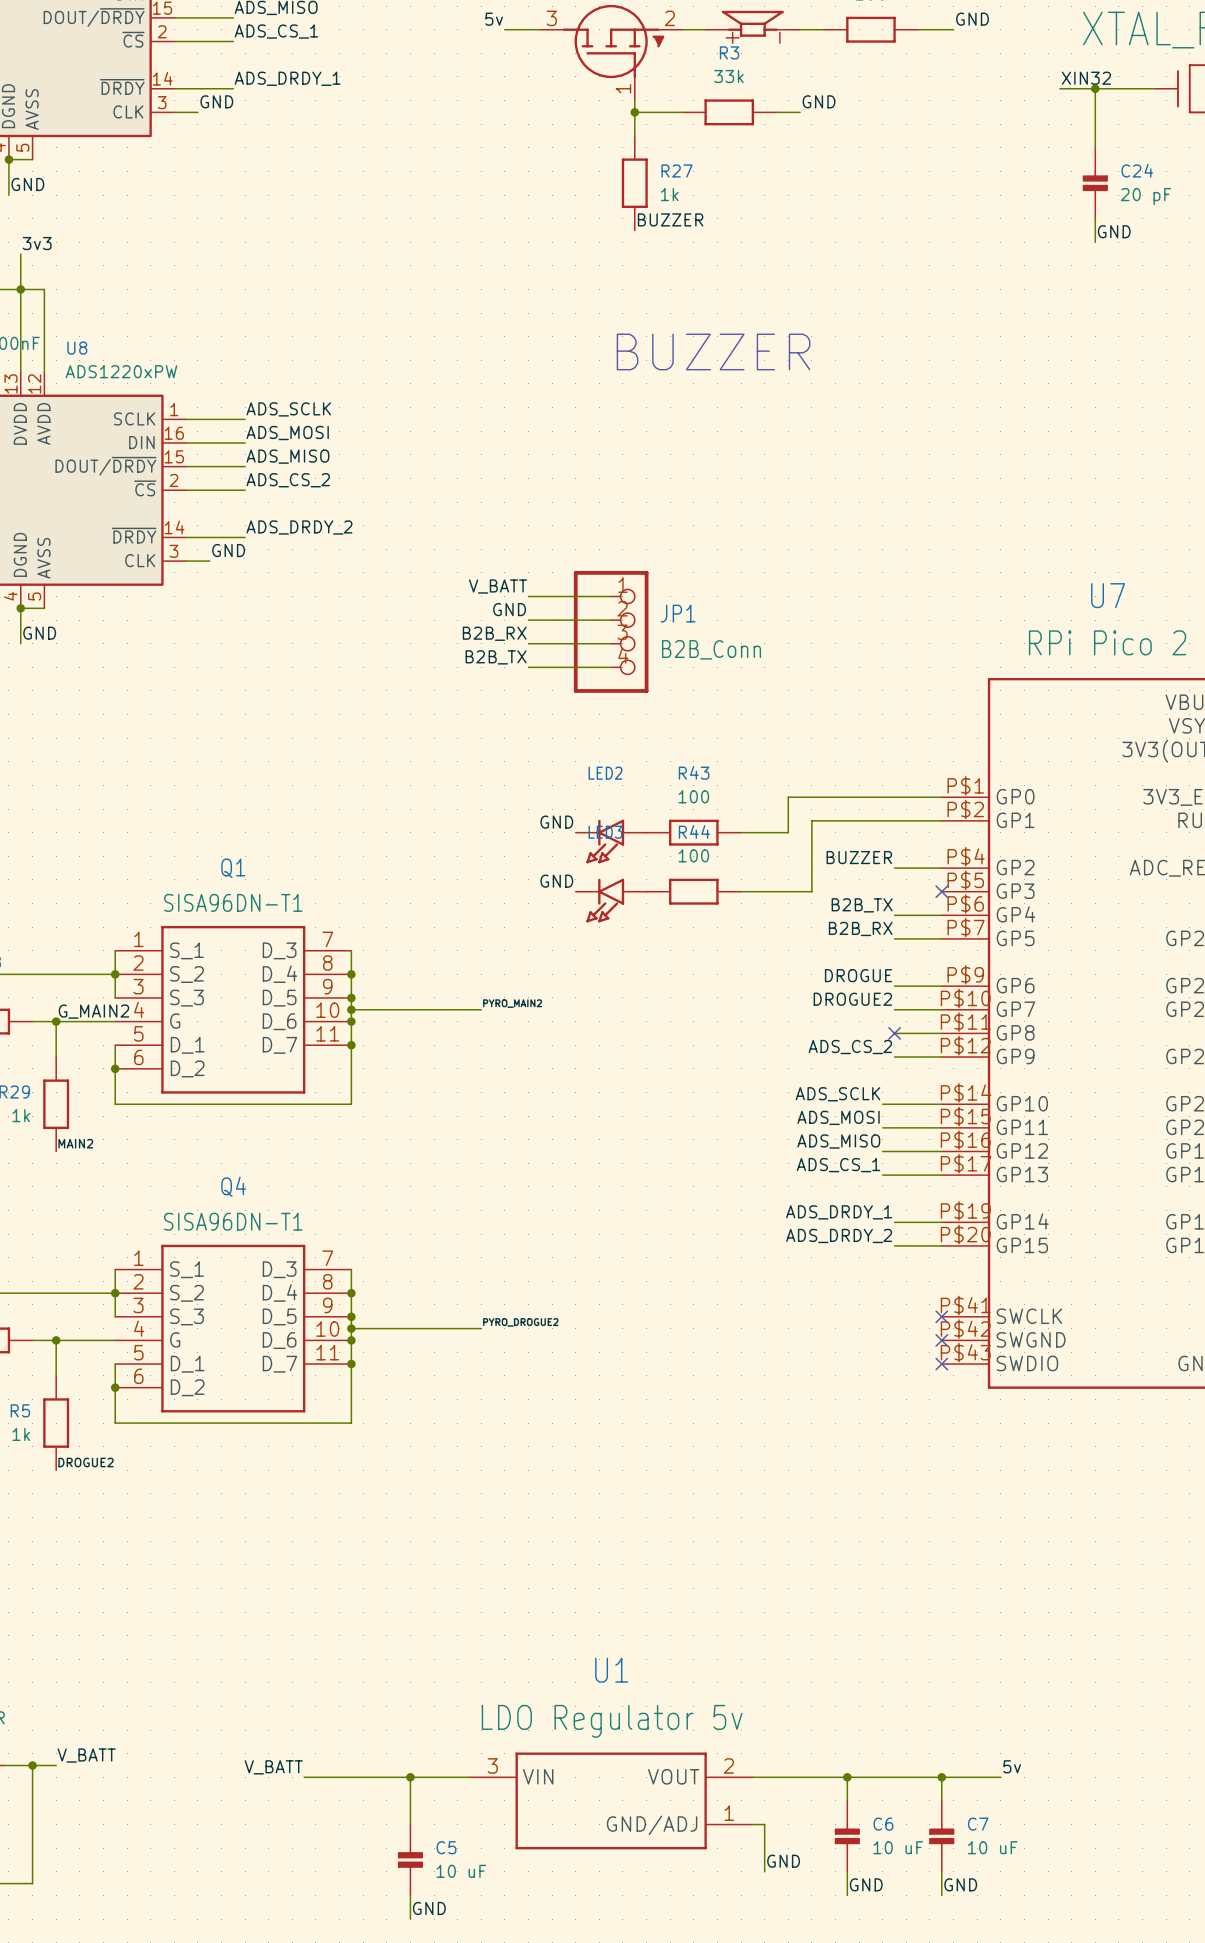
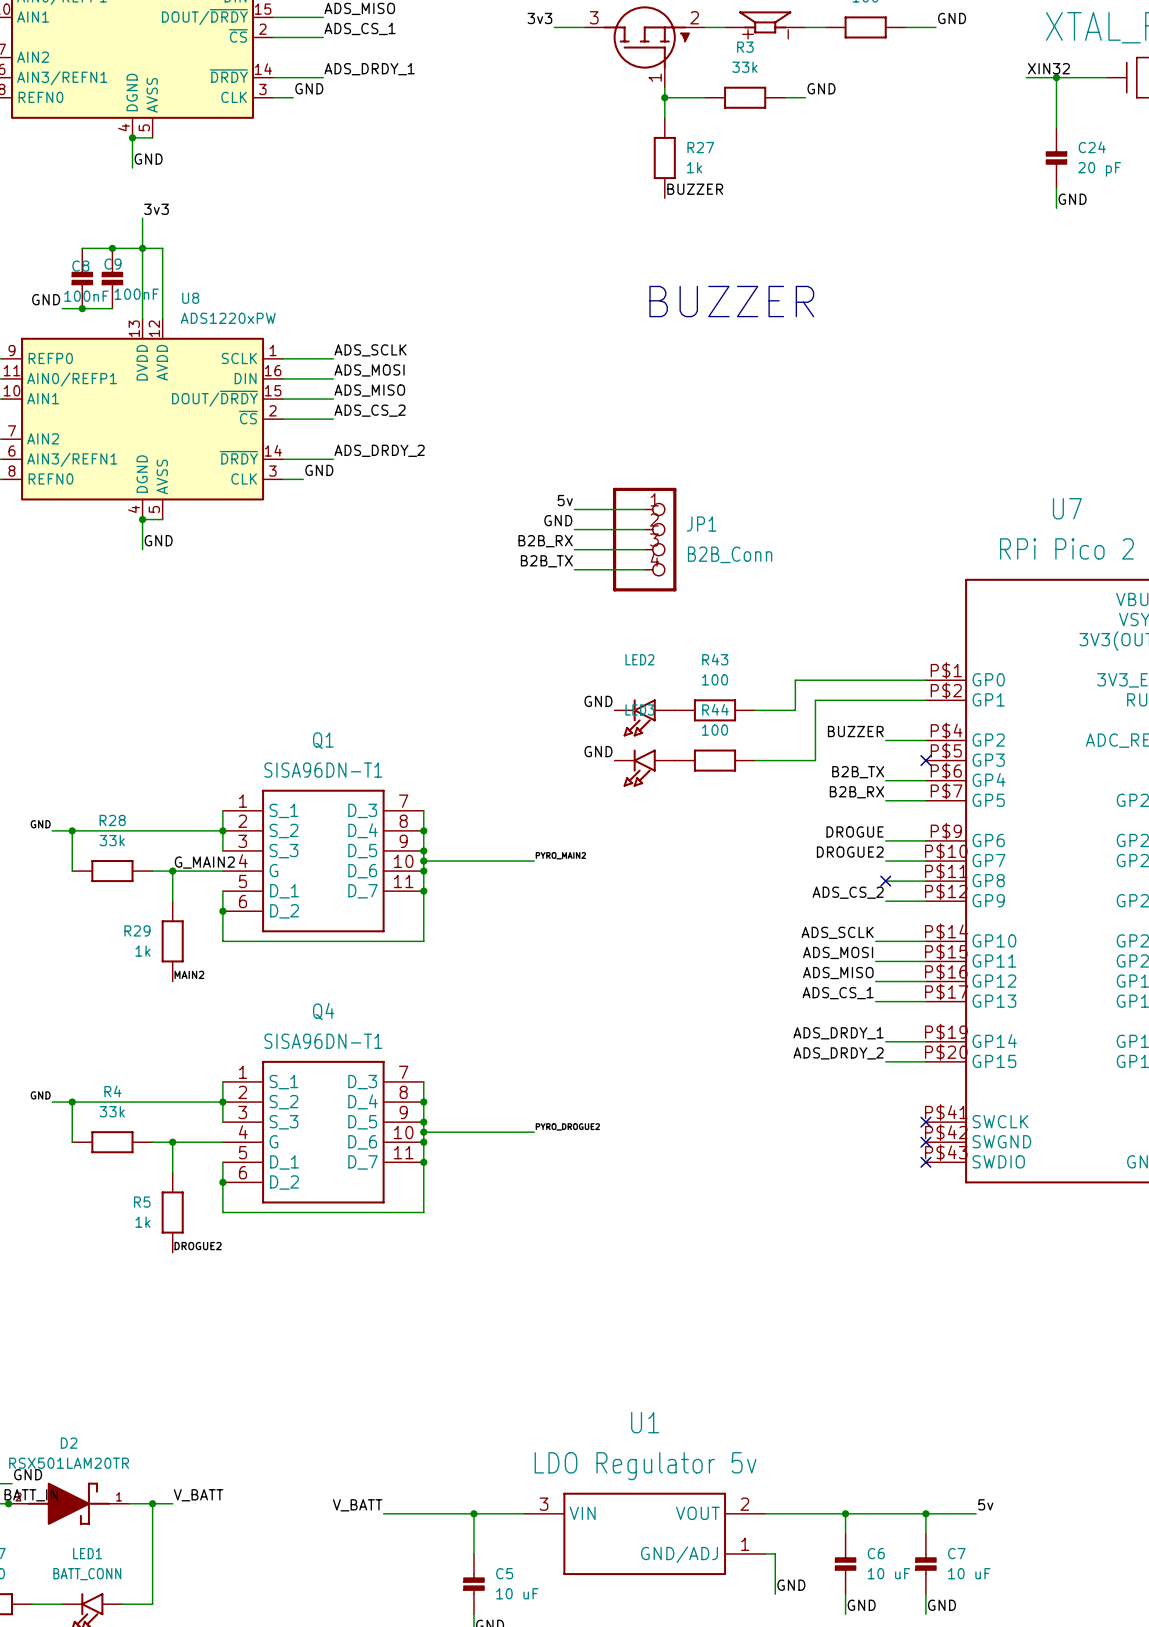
label: 5v (494, 19) -> 3v3 (539, 18)
label: V_BATT (498, 586) -> 5v (565, 500)

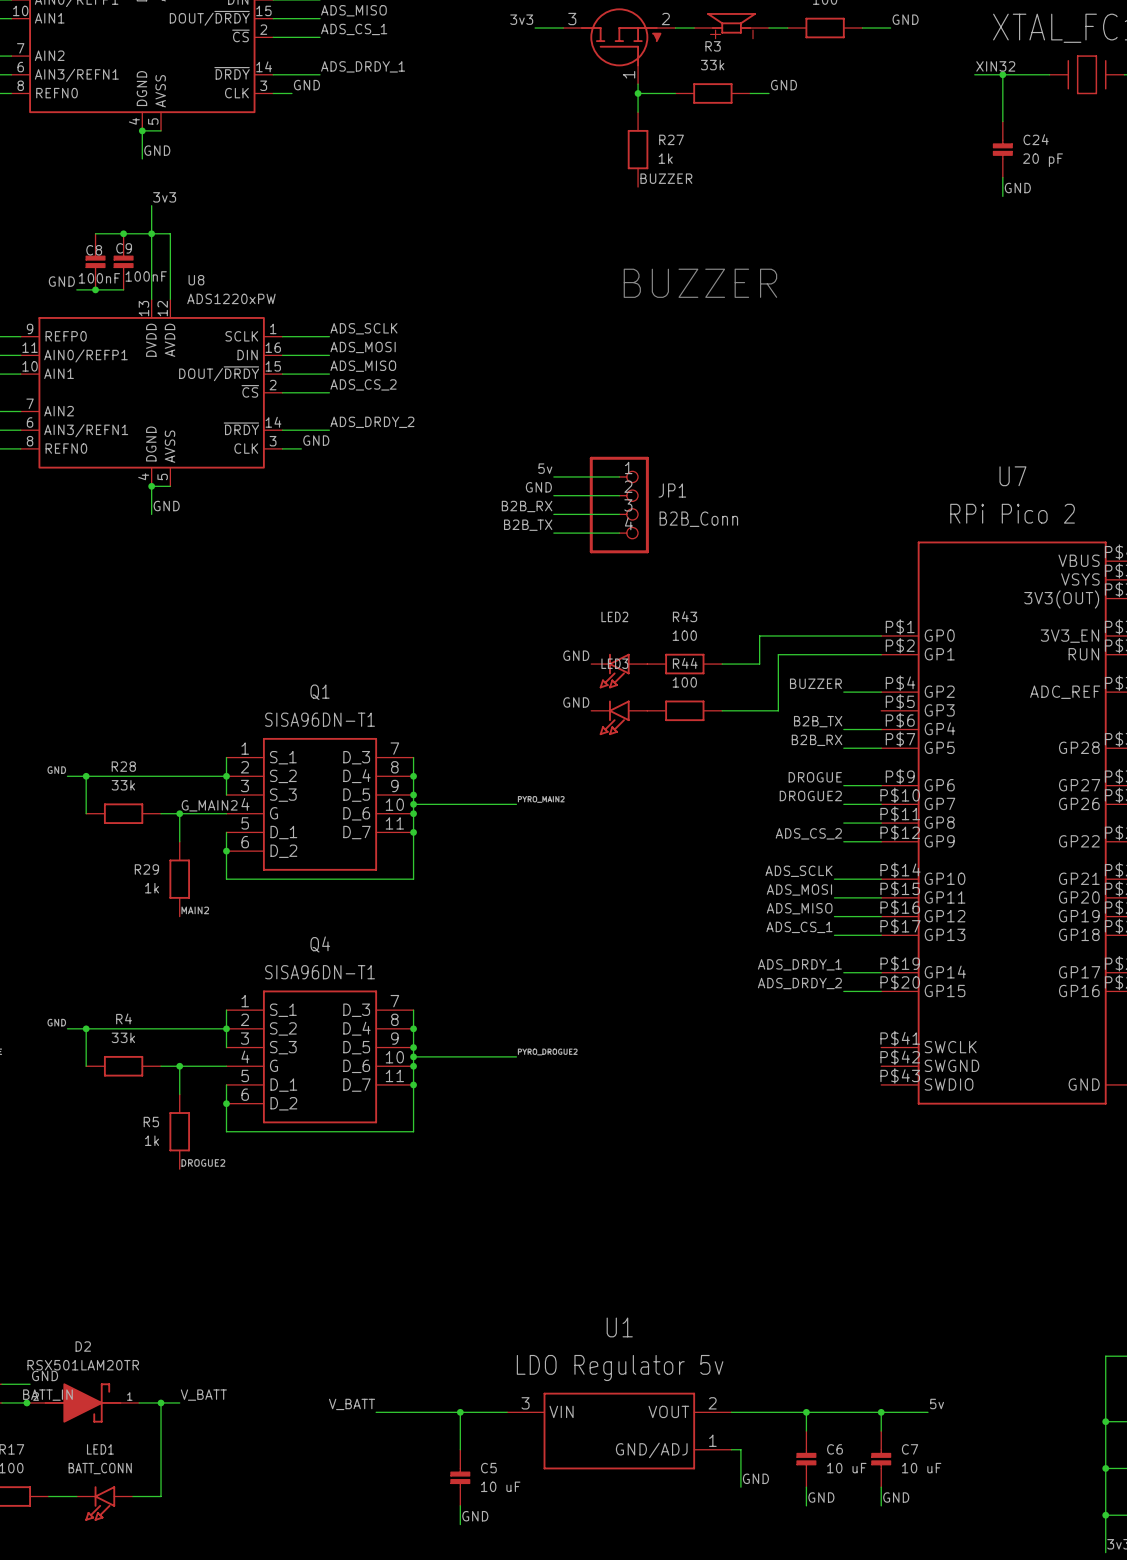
no-connect mark: (925, 760) -> none
no-connect mark: (885, 881) -> none
no-connect mark: (925, 1122) -> none
no-connect mark: (925, 1142) -> none
no-connect mark: (925, 1162) -> none

